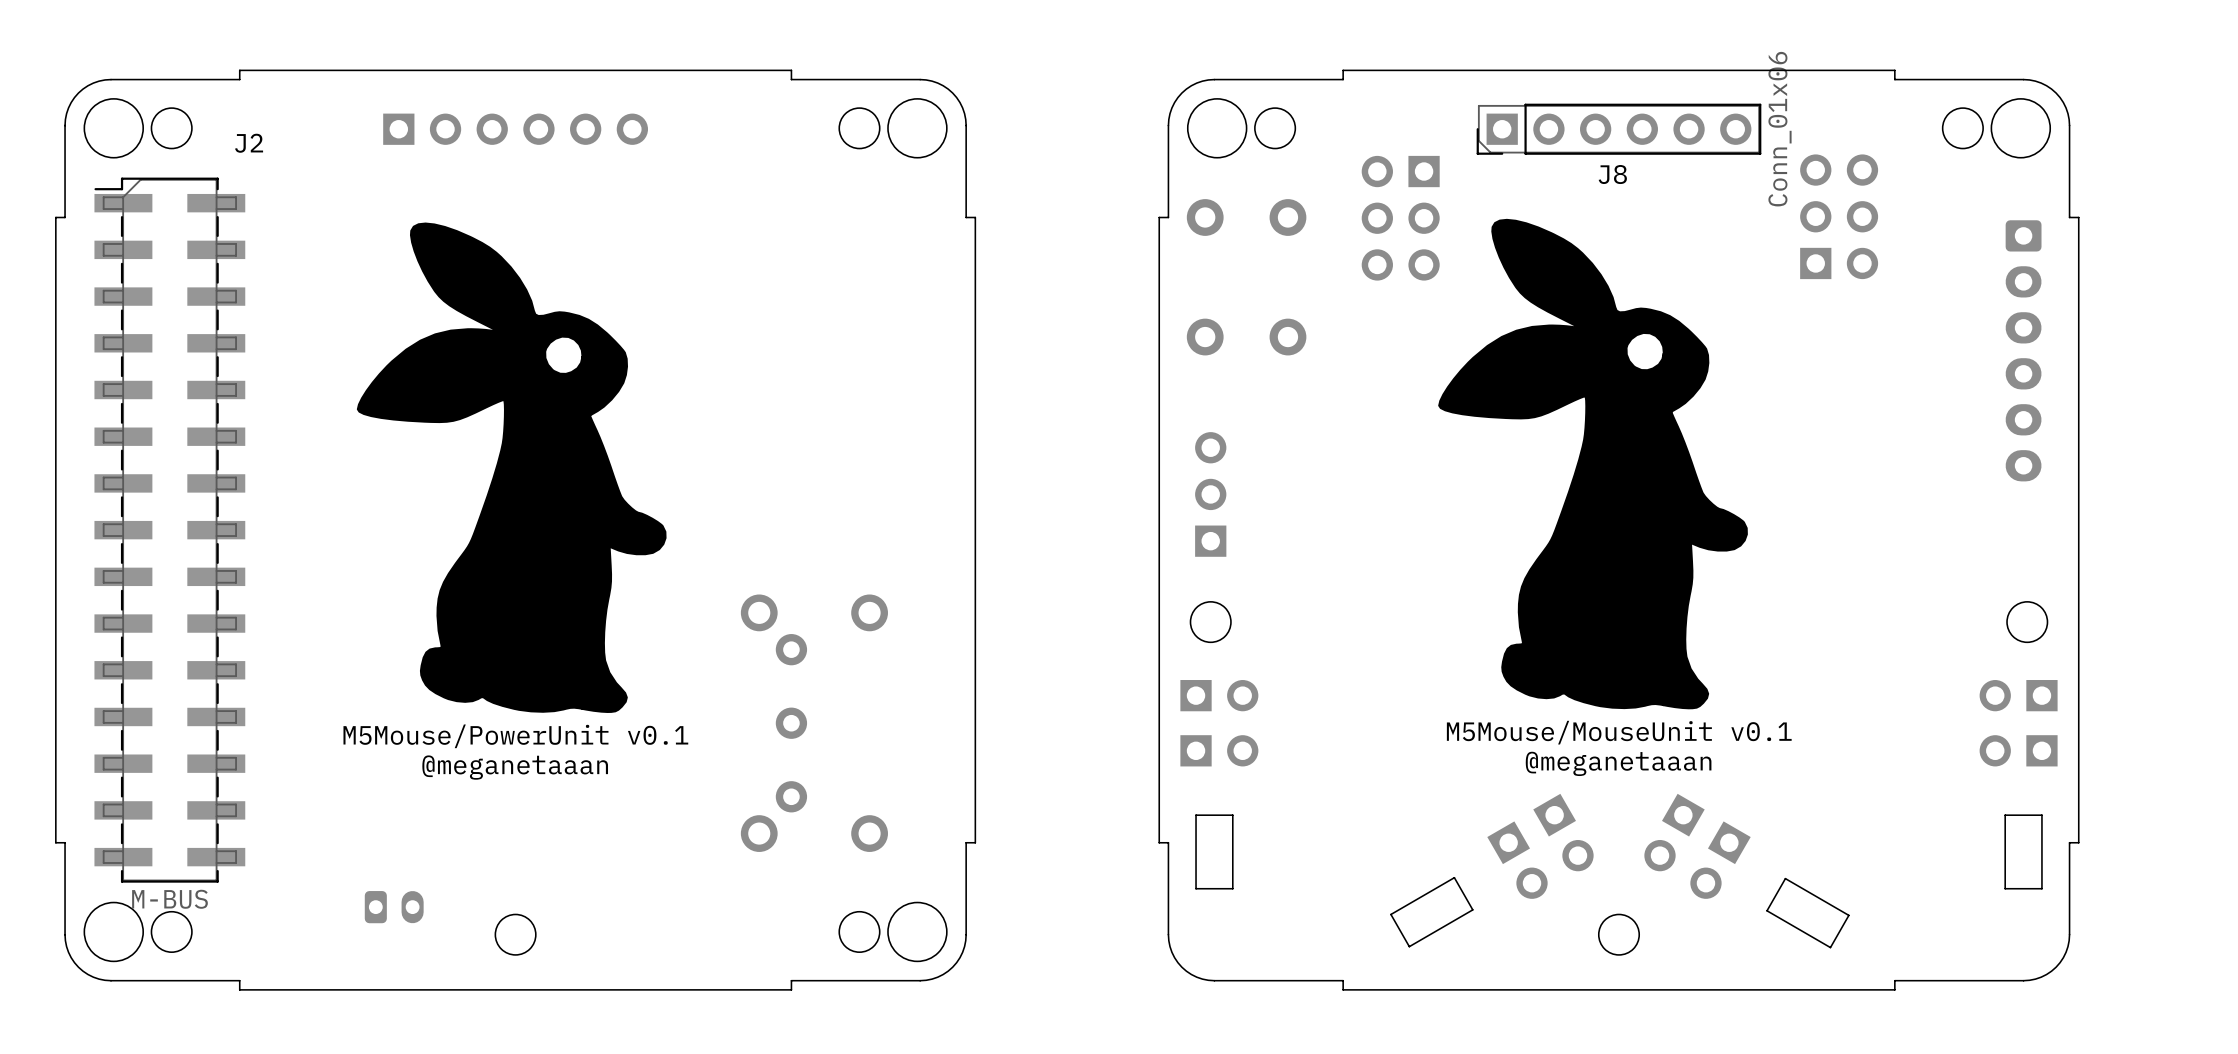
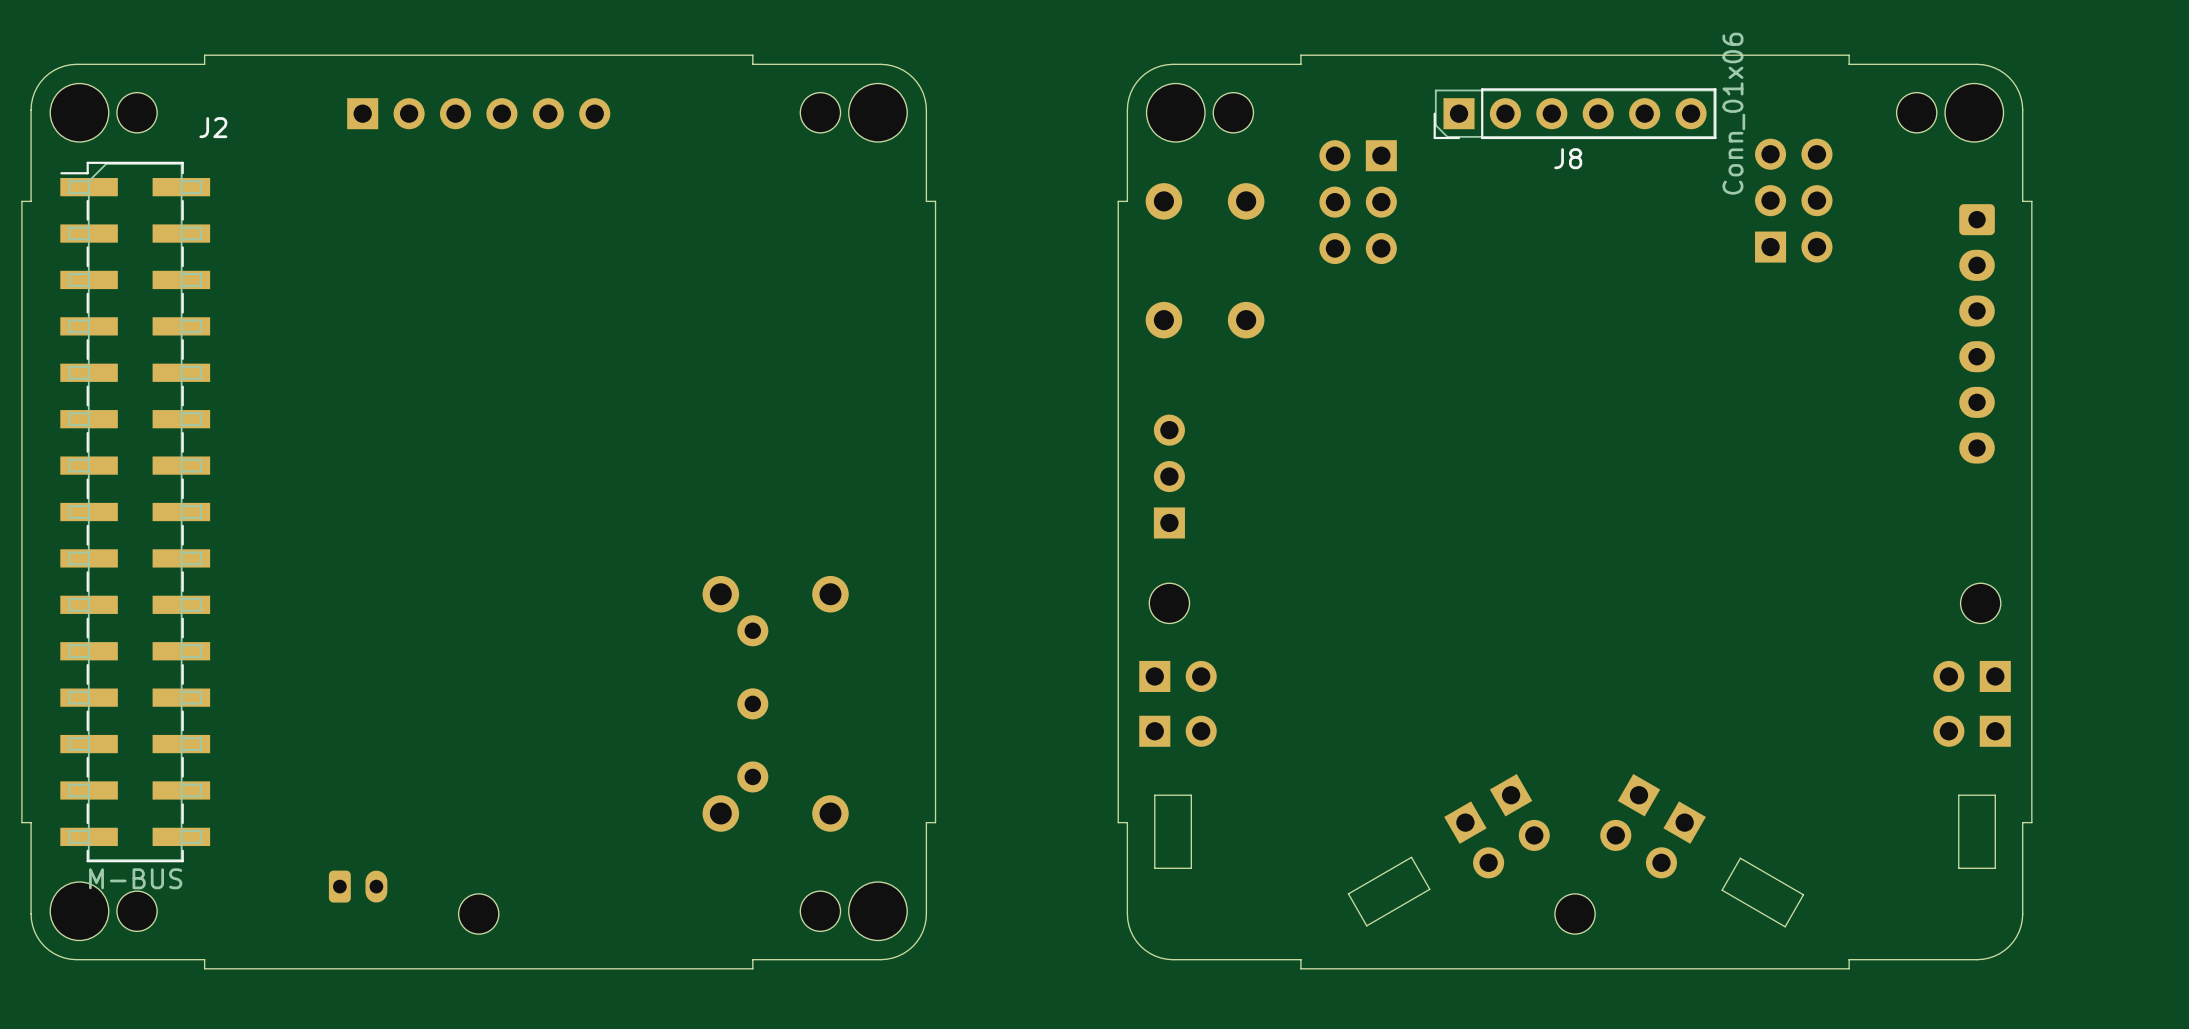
drawing: [1438, 218, 1748, 710] -> none
drawing: [356, 222, 667, 713] -> none
text: M5Mouse/MouseUnit v0.1 (1619, 732) -> none
text: M5Mouse/PowerUnit v0.1 (515, 736) -> none
text: @meganetaaan (1618, 763) -> none
text: @meganetaaan (515, 767) -> none

